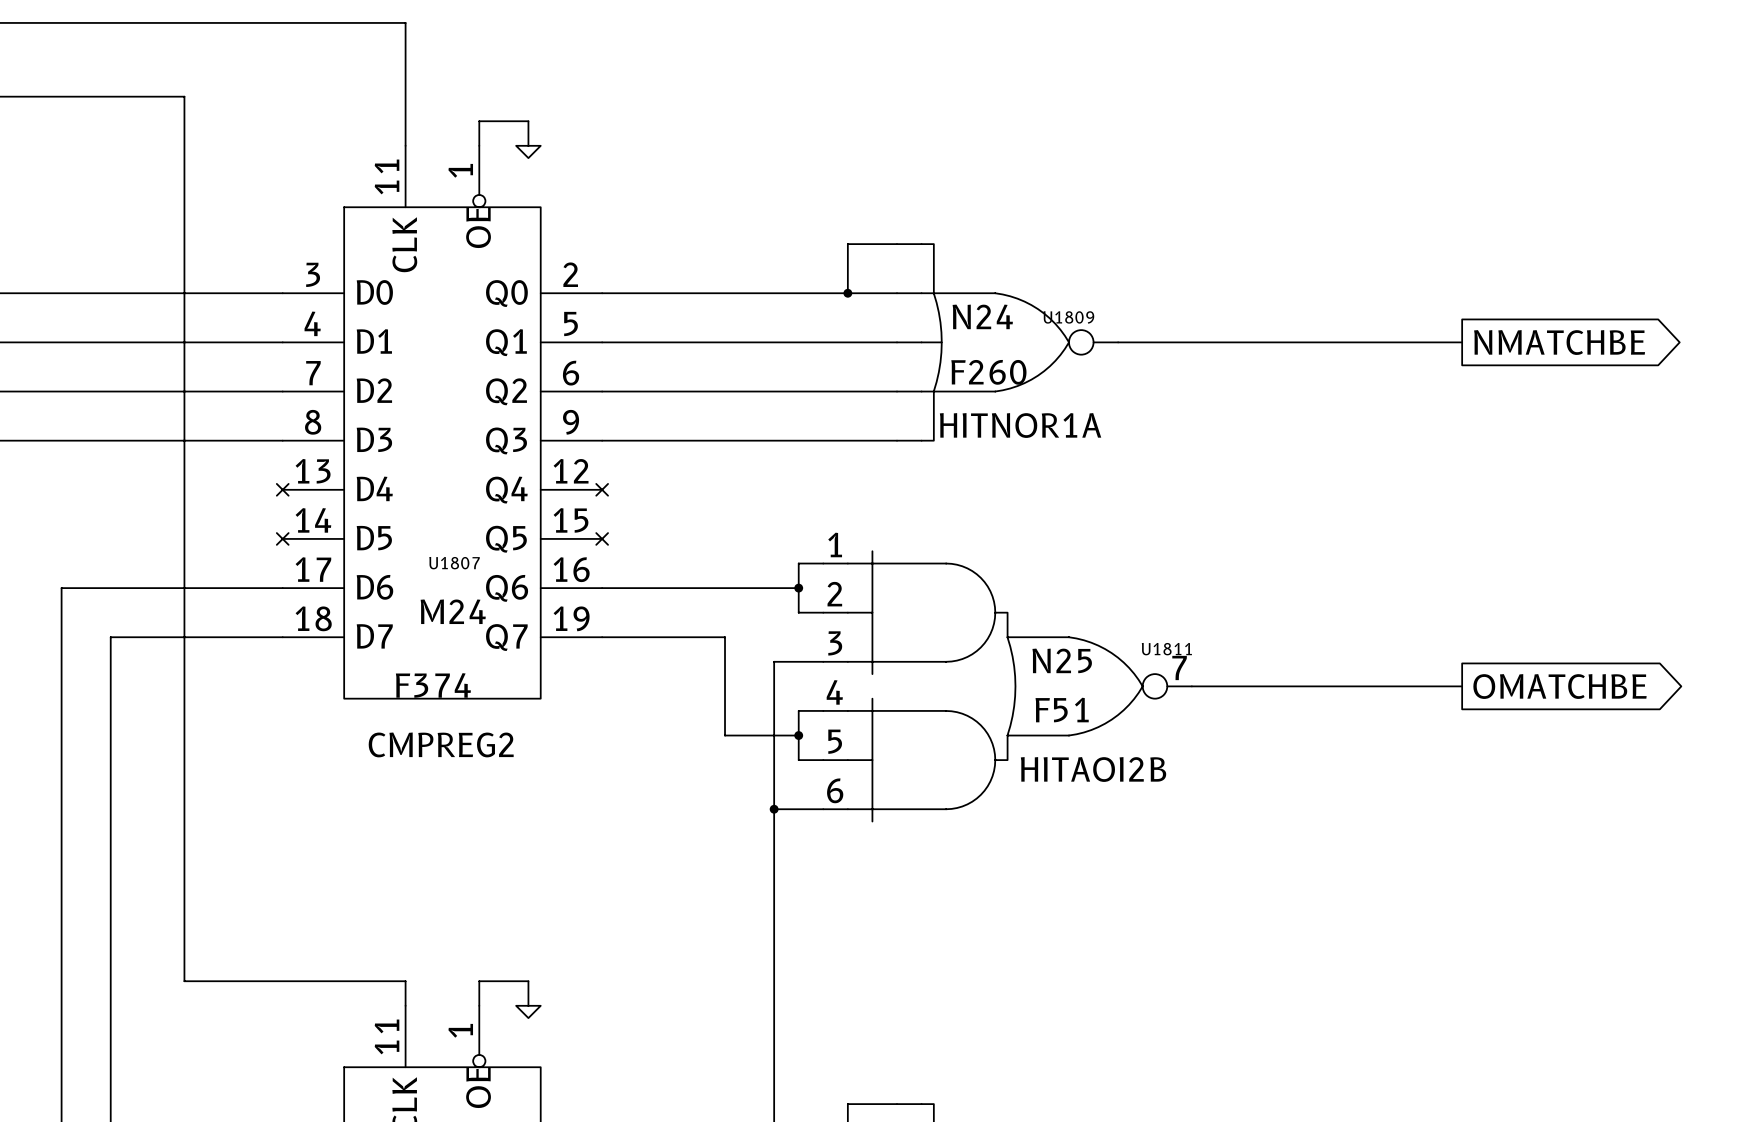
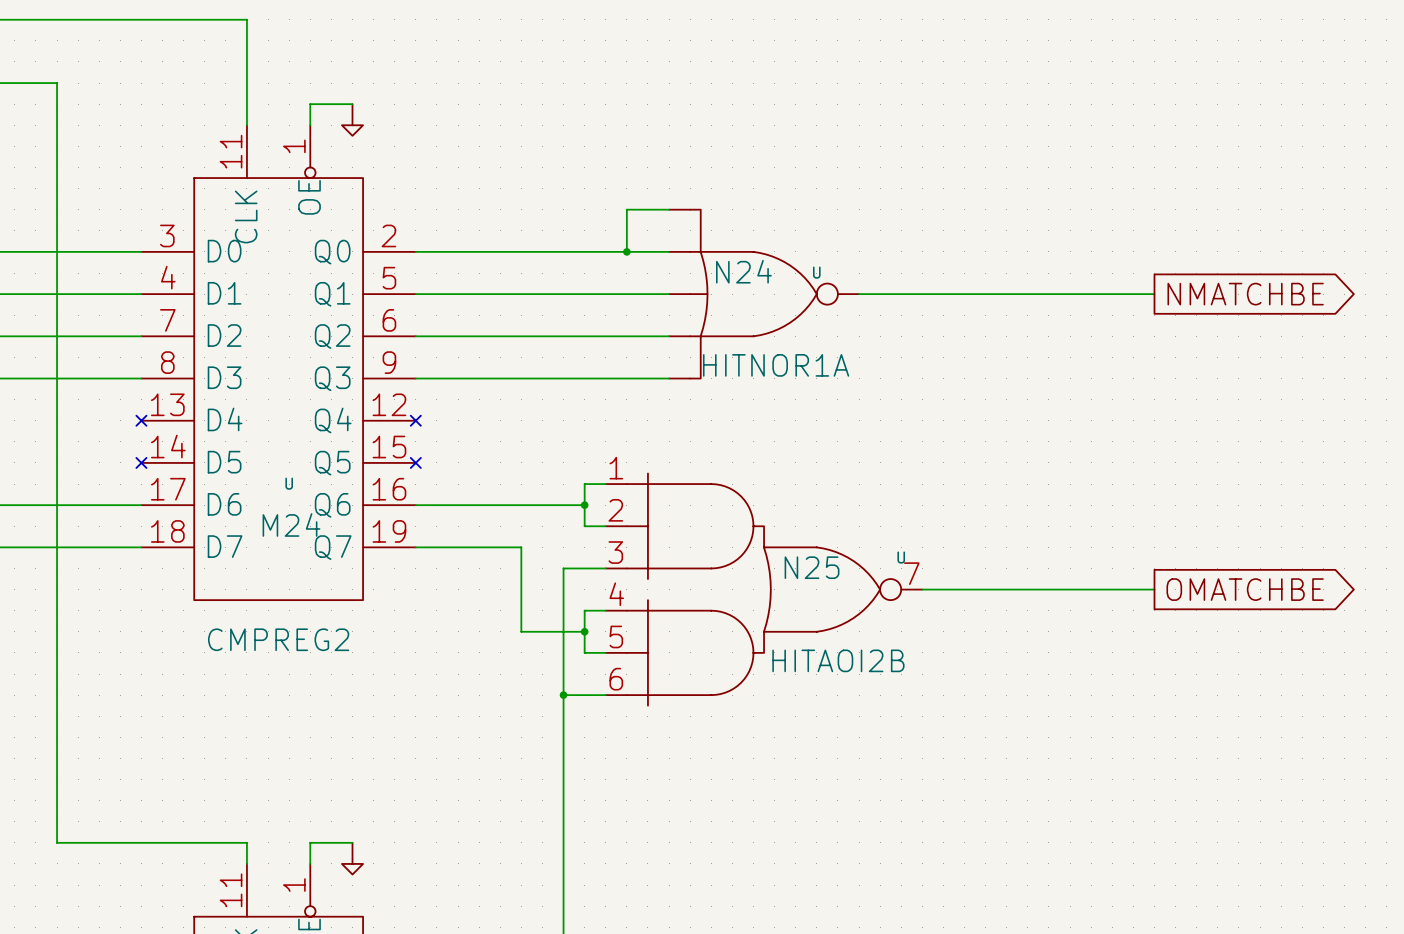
U1809 name: U1809 (1068, 317) -> U (816, 272)
U1809 value: F260 (988, 372) -> none
U1807 name: U1807 (454, 563) -> U (289, 483)
U1811 name: U1811 (1166, 649) -> U (901, 557)
U1807 value: F374 (433, 685) -> none
U1811 value: F51 (1062, 710) -> none

